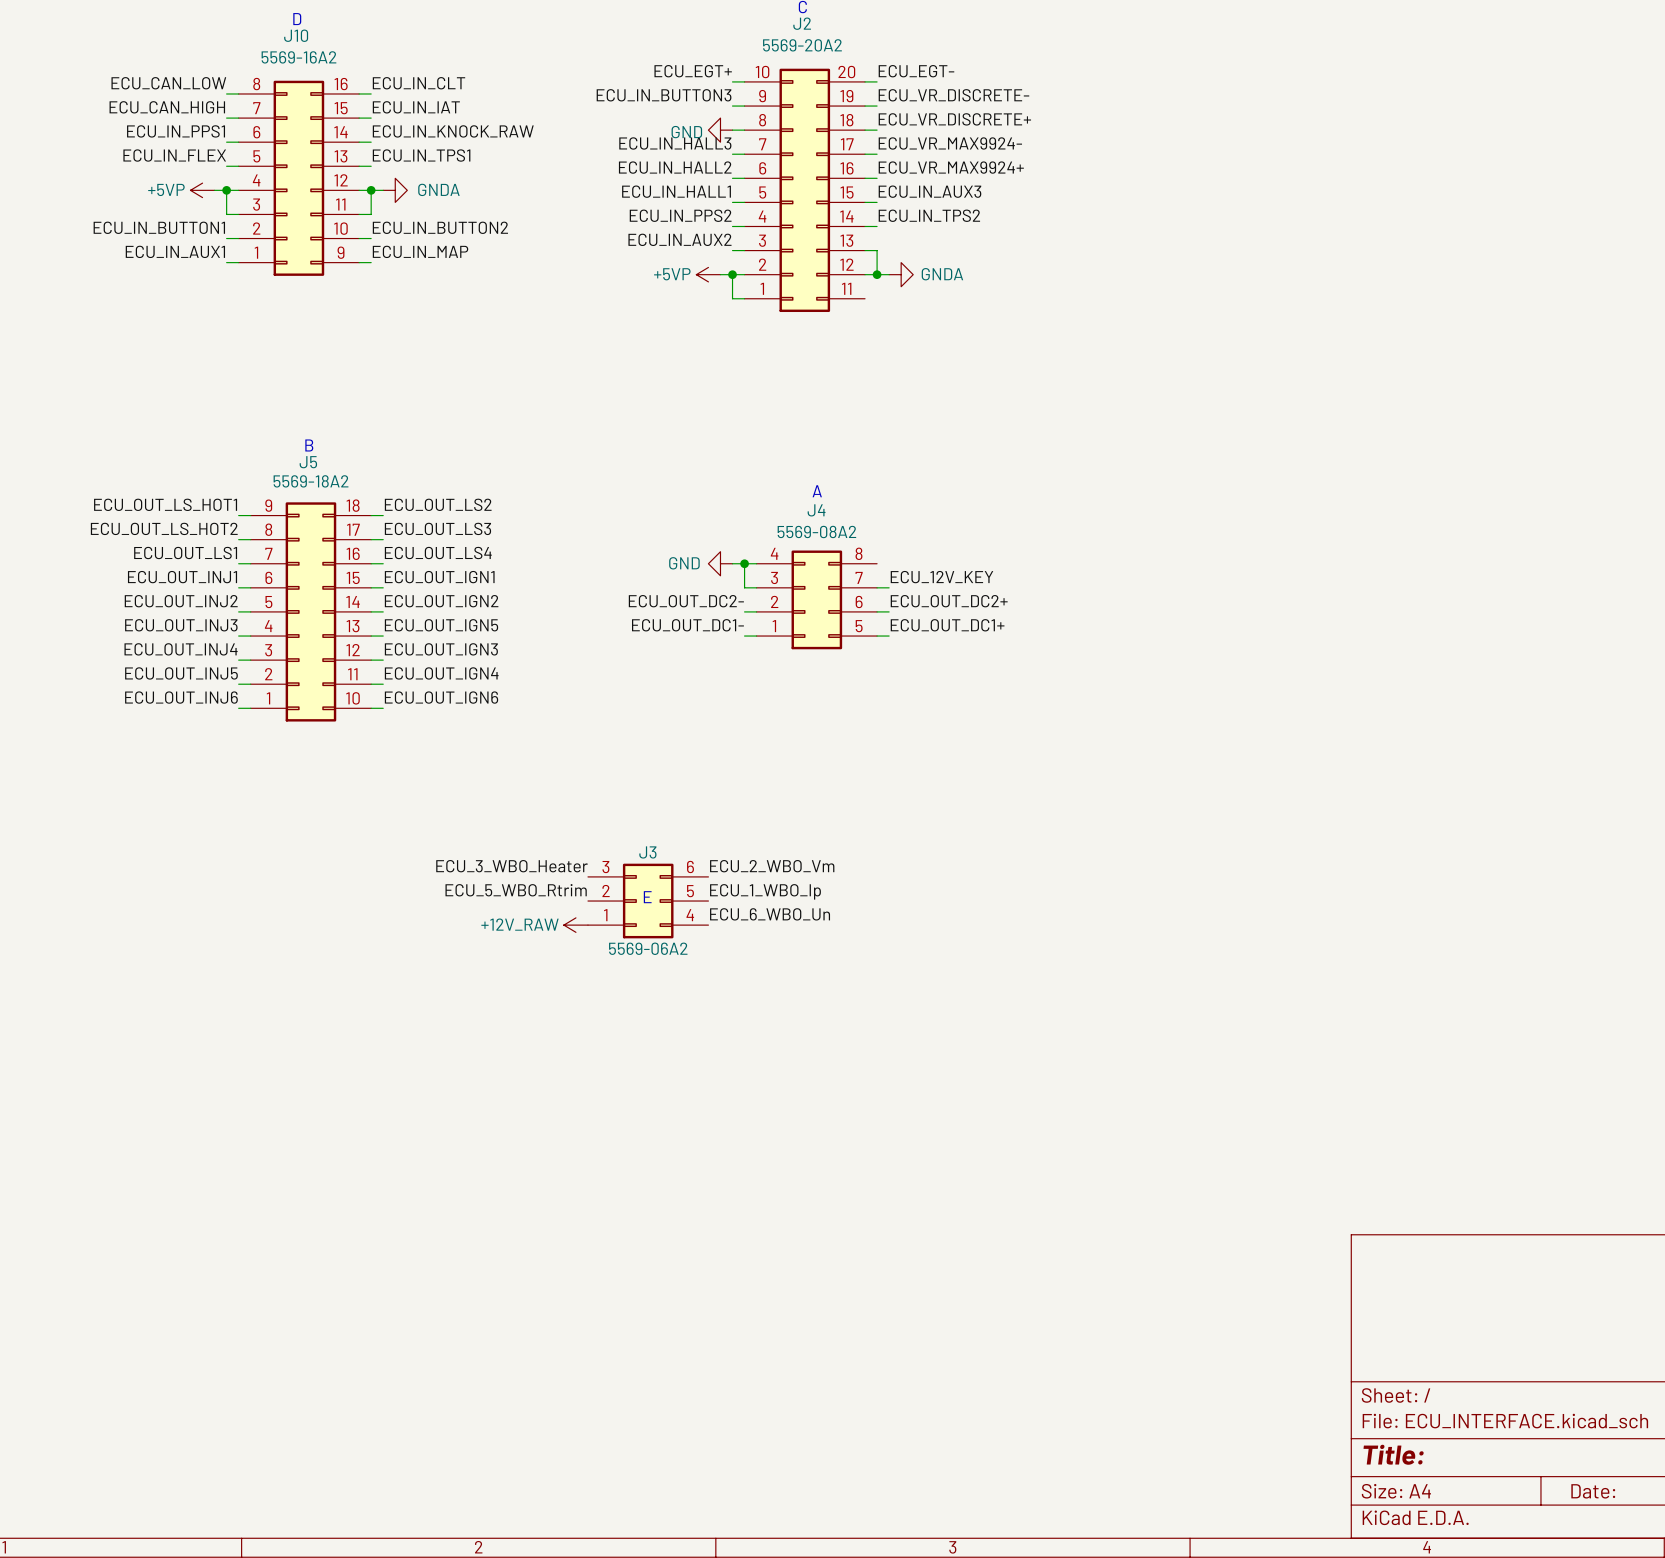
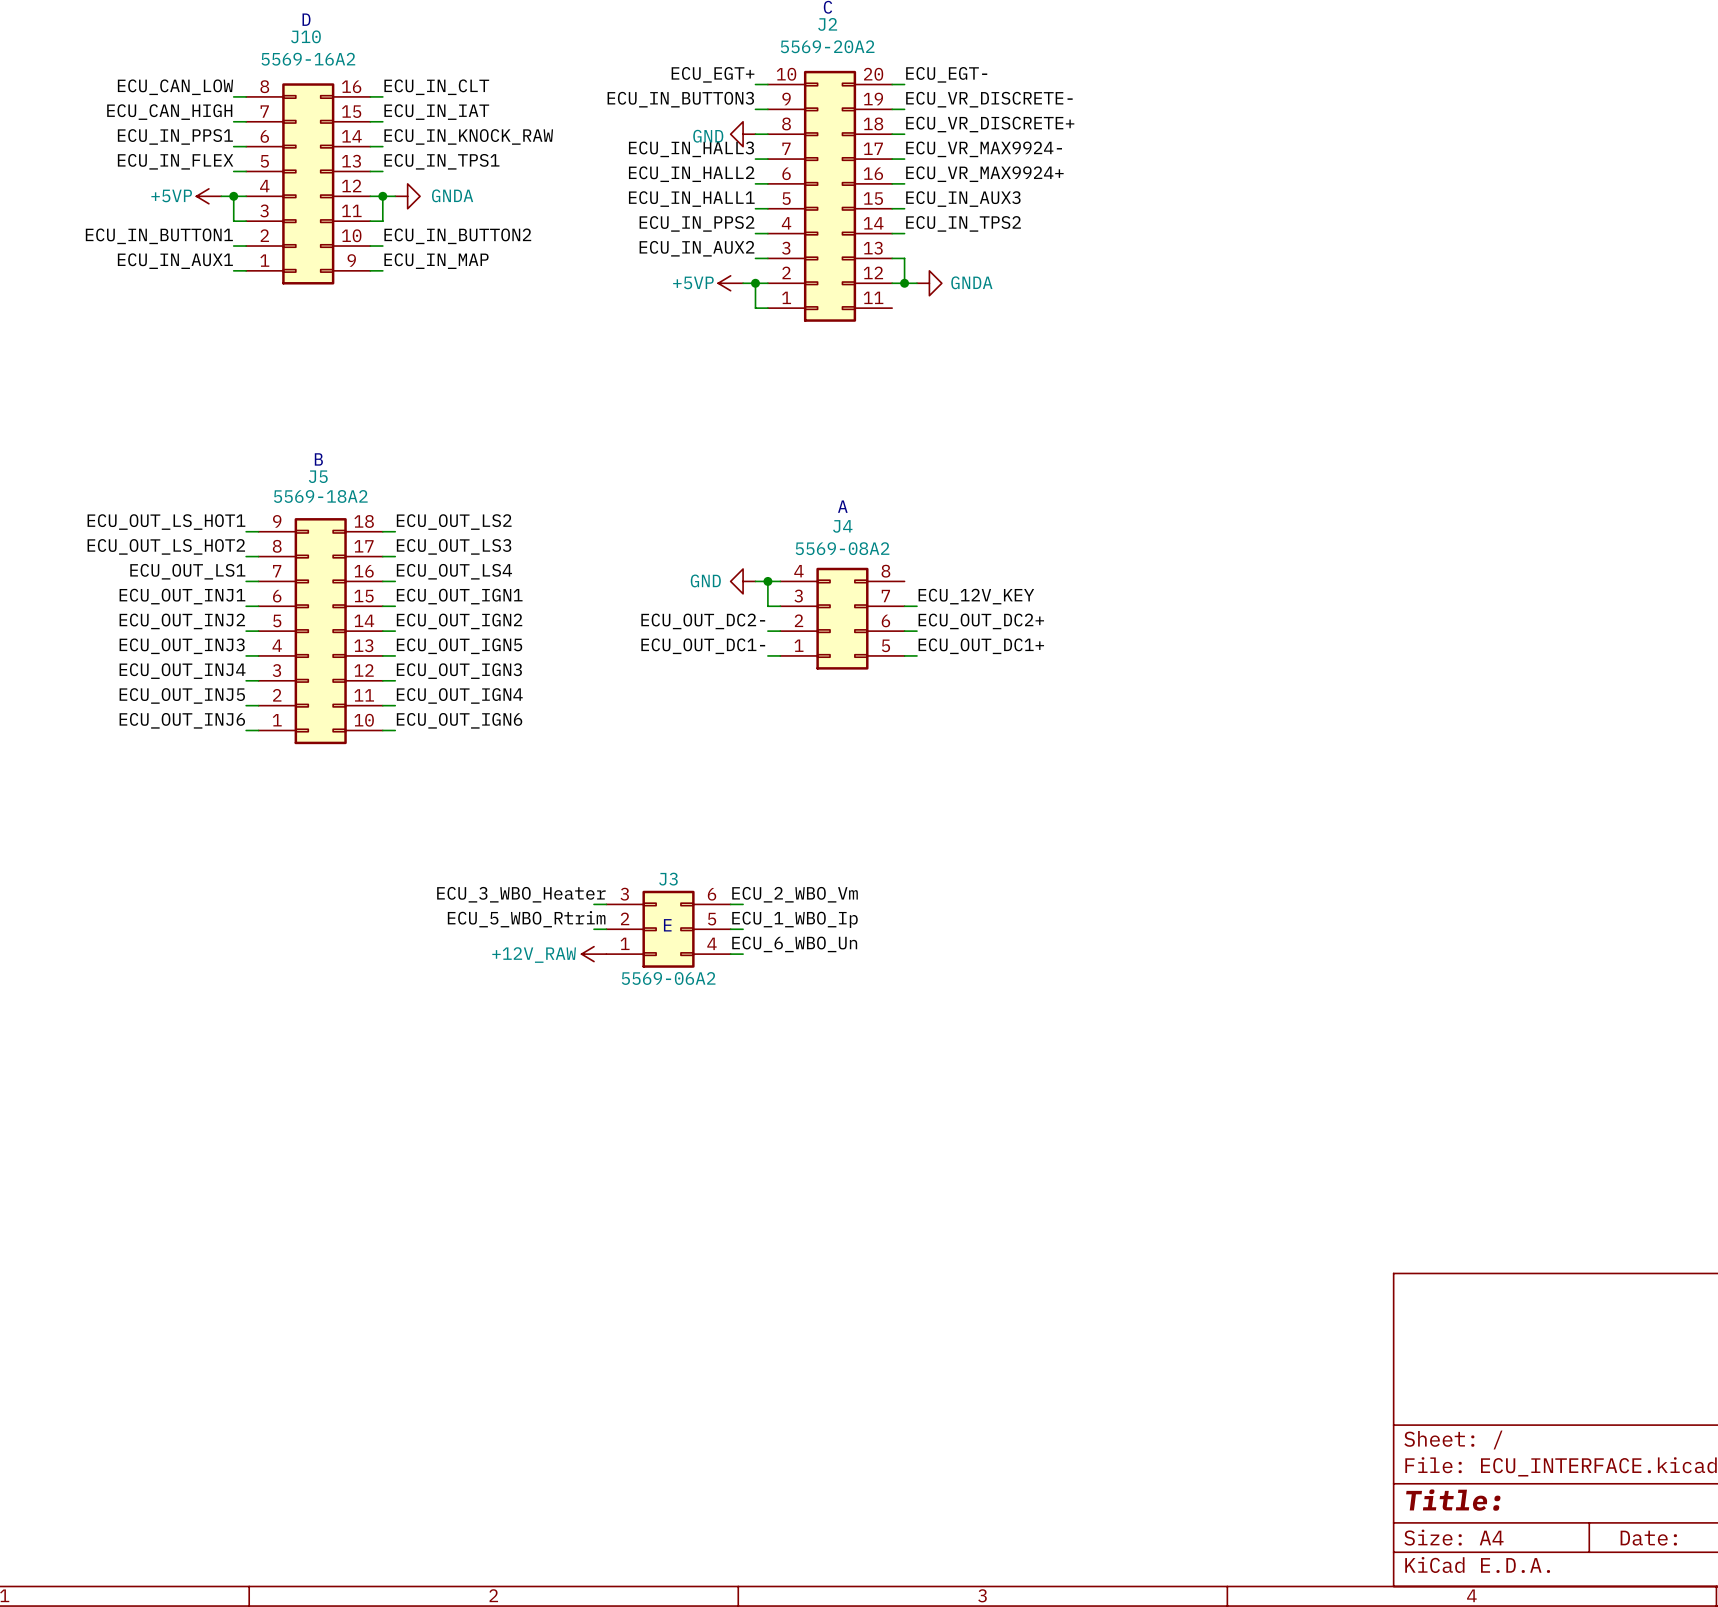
wire: none -> (593, 904) (606, 904)
wire: none -> (730, 904) (743, 904)
wire: none -> (593, 929) (606, 929)
wire: none -> (730, 929) (743, 929)
wire: none -> (730, 954) (743, 954)

